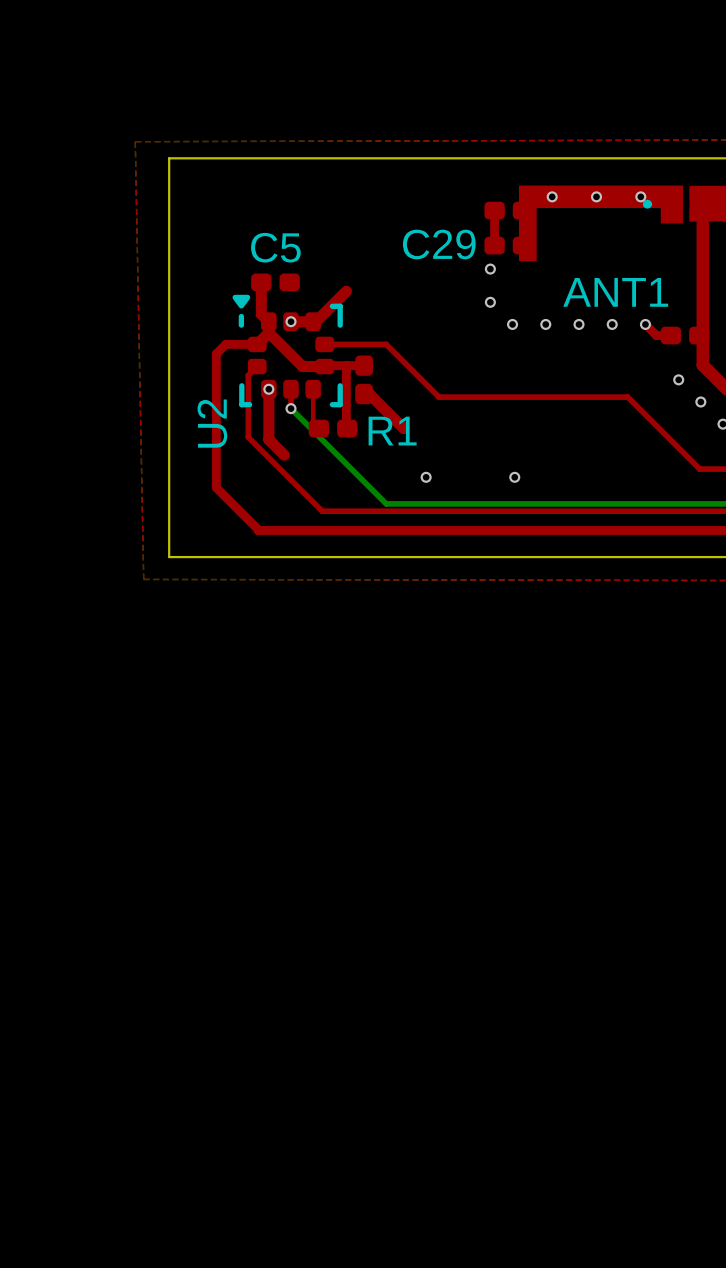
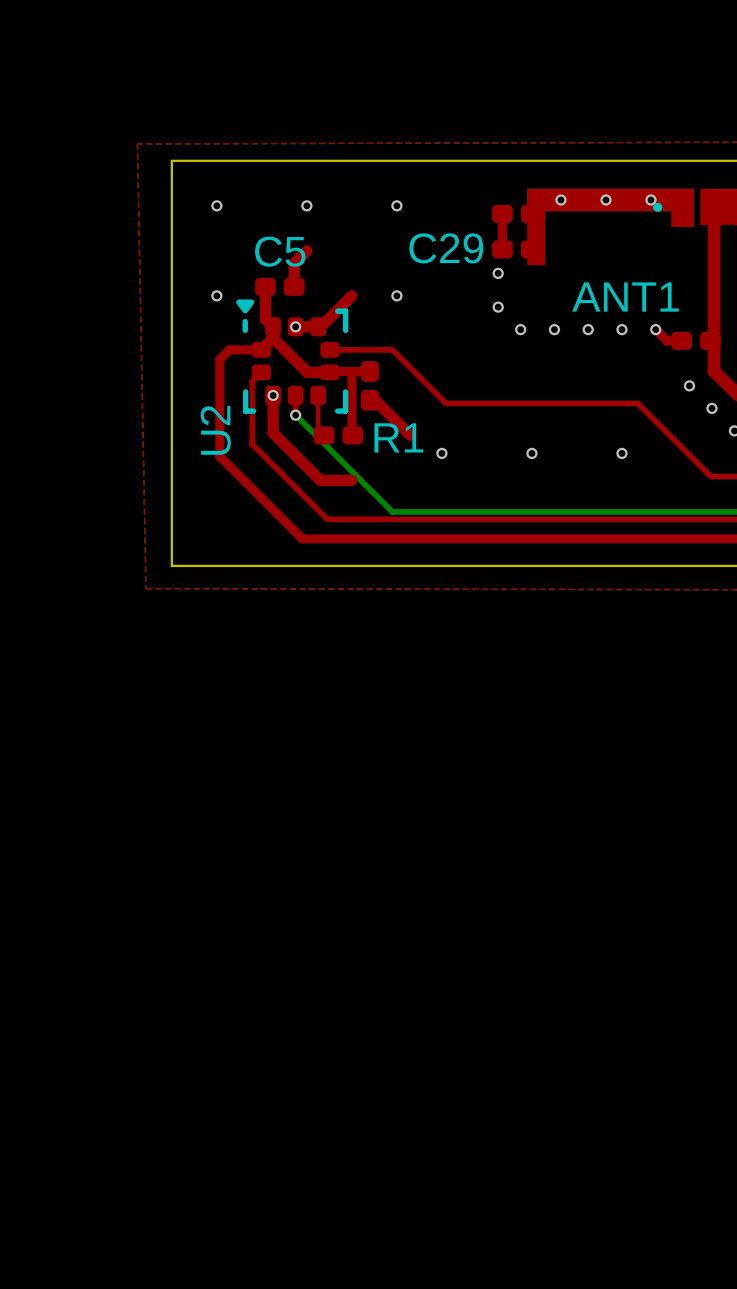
via: none -> (216, 205)
via: none -> (306, 205)
via: none -> (396, 205)
top track: none -> (306, 250) (294, 263) (294, 286)
via: none -> (216, 295)
via: none -> (396, 295)
top track: (268, 426) (268, 439) (284, 455) -> (273, 433) (320, 480) (351, 480)
via: none -> (621, 453)
top track: (216, 449) (216, 487) (258, 529) -> (219, 456) (302, 538)
via position: (426, 477) -> (441, 453)
via position: (514, 477) -> (531, 453)
top track: (258, 530) (297, 530) -> none

